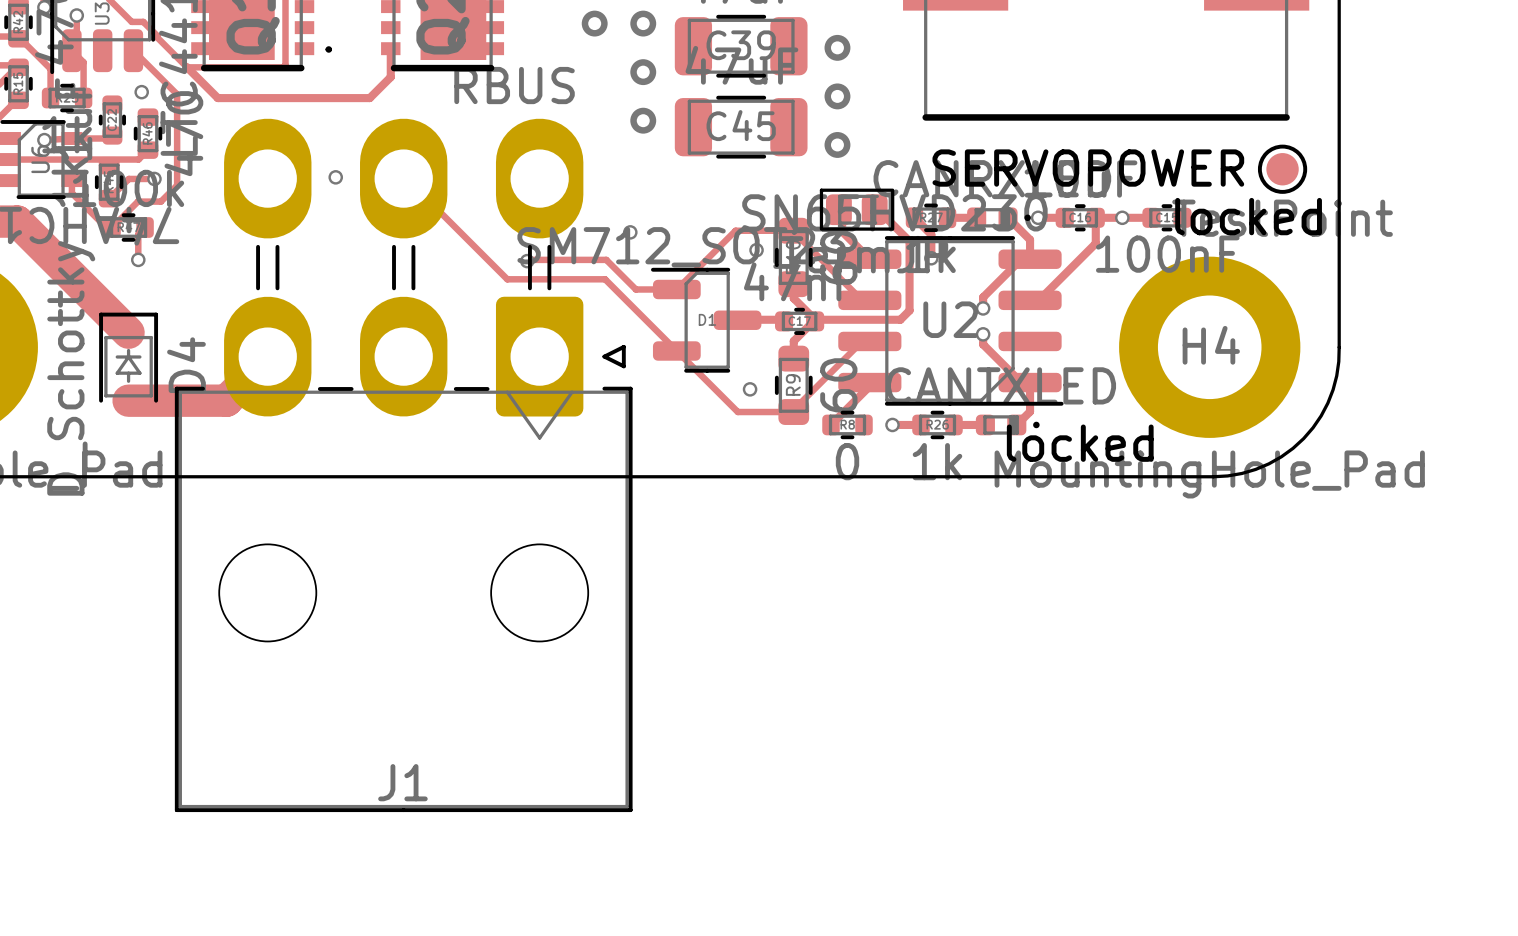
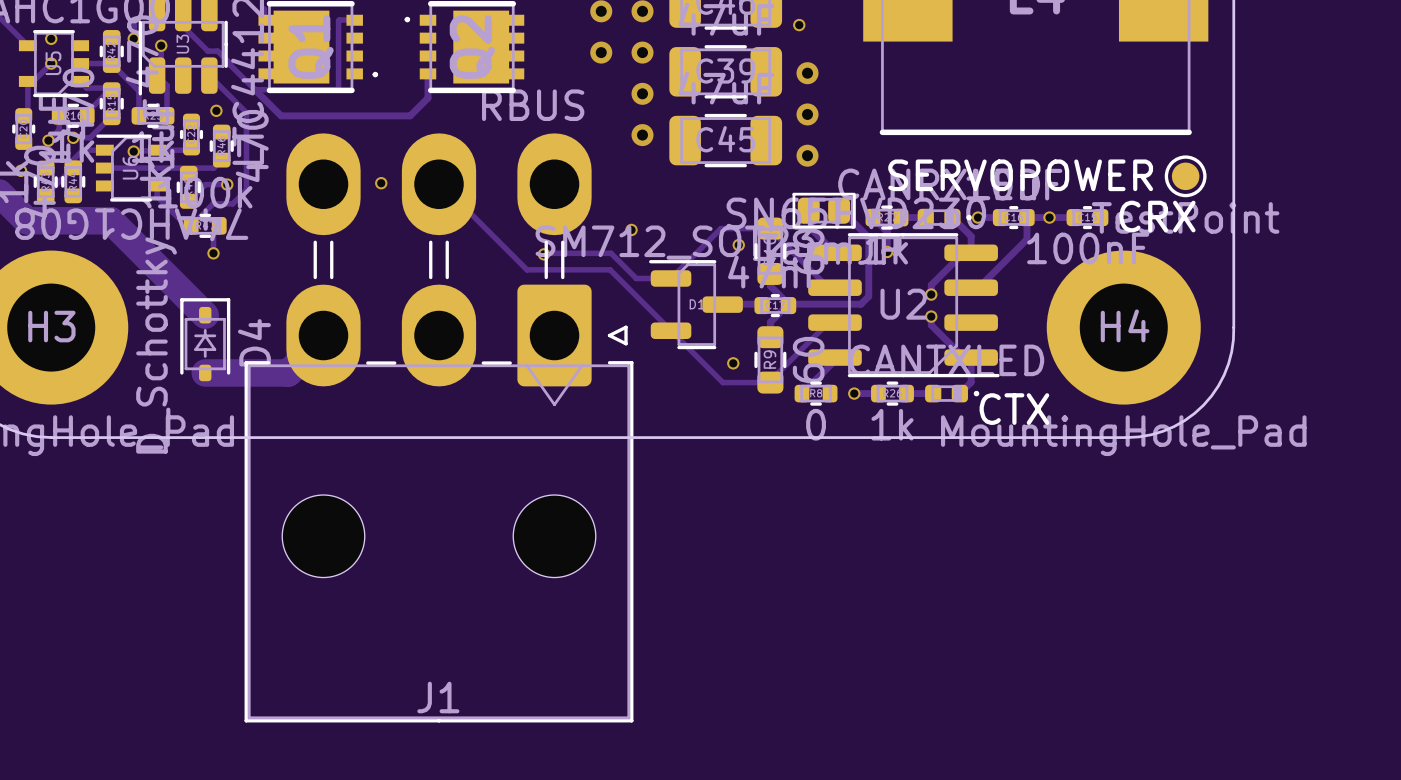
locked name: locked (1248, 216) -> CRX (1157, 216)
locked name: locked (1080, 443) -> CTX (1014, 409)

